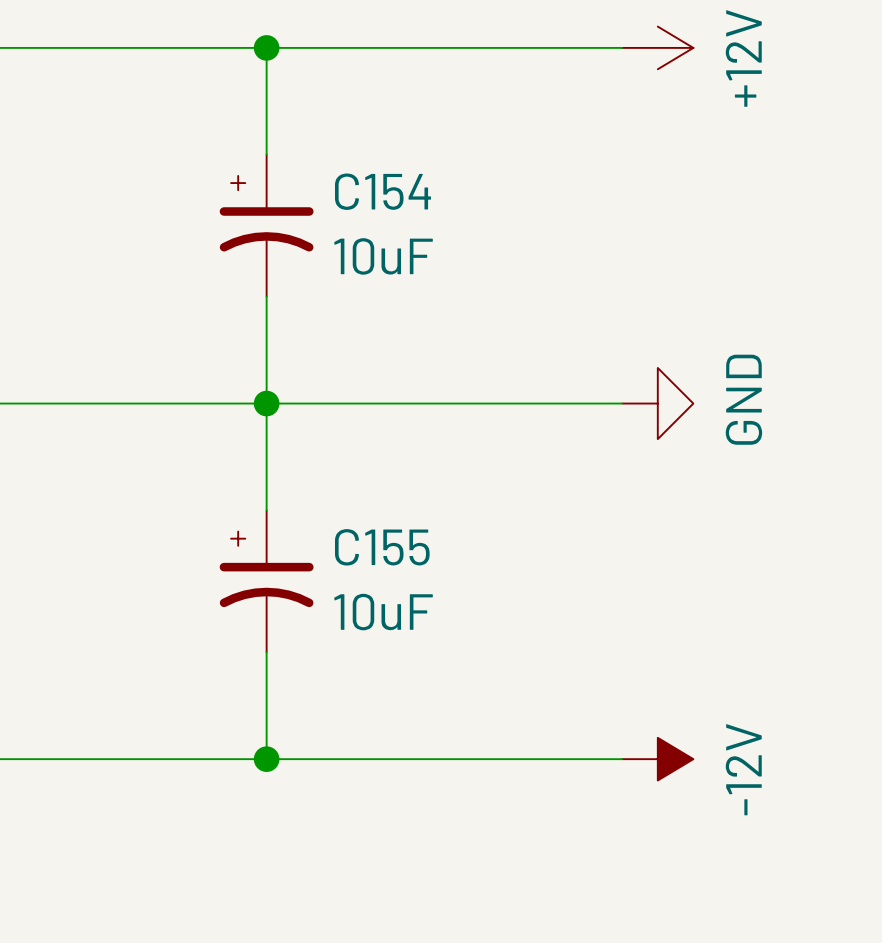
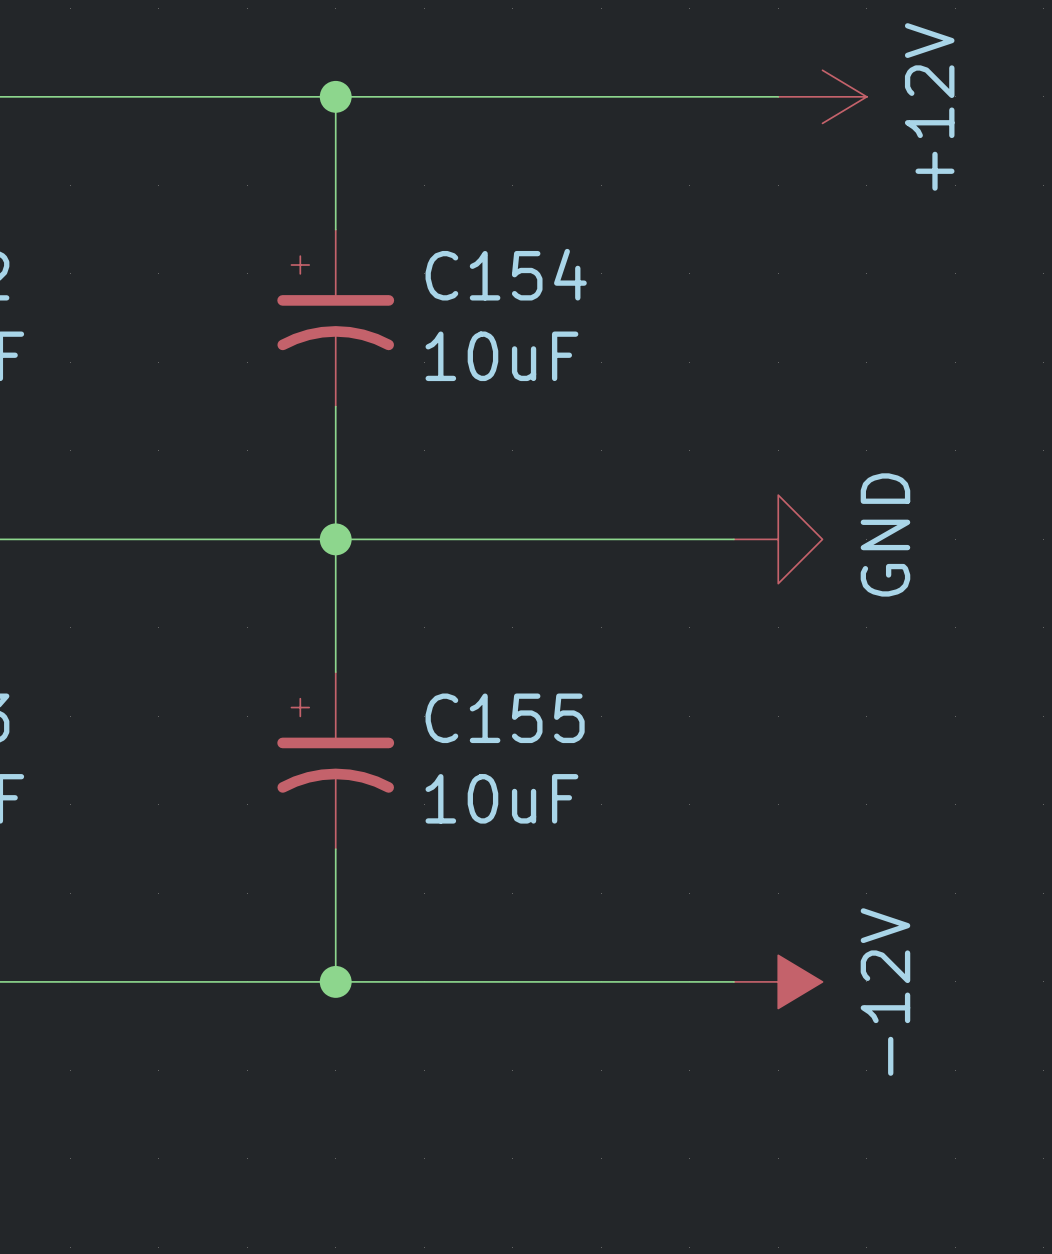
power symbol position: GND (657, 403) -> GND (778, 539)
power symbol position: -12V (657, 759) -> -12V (778, 981)

